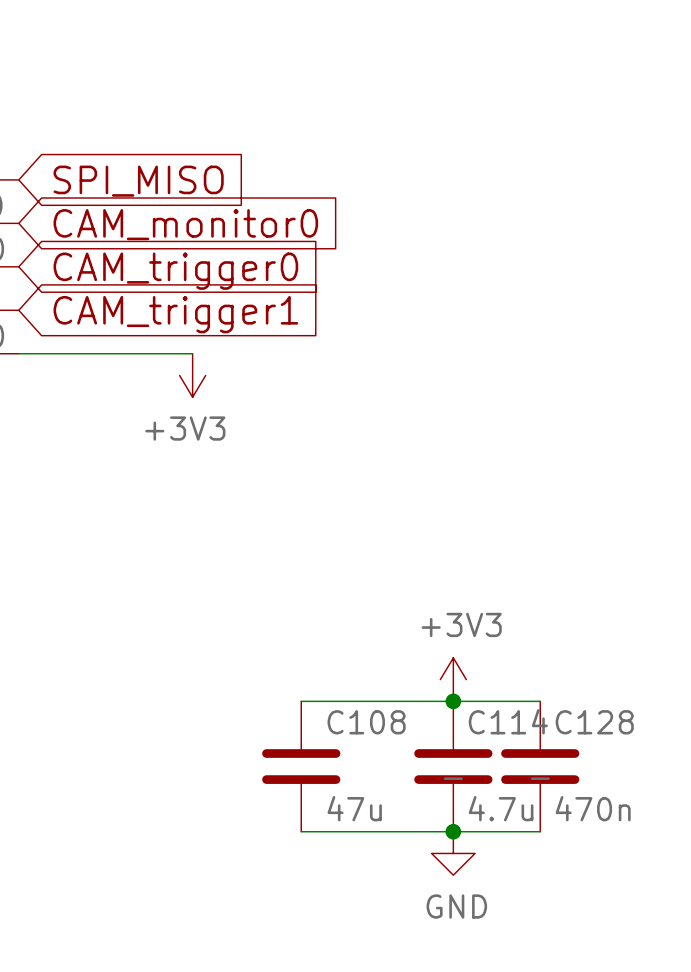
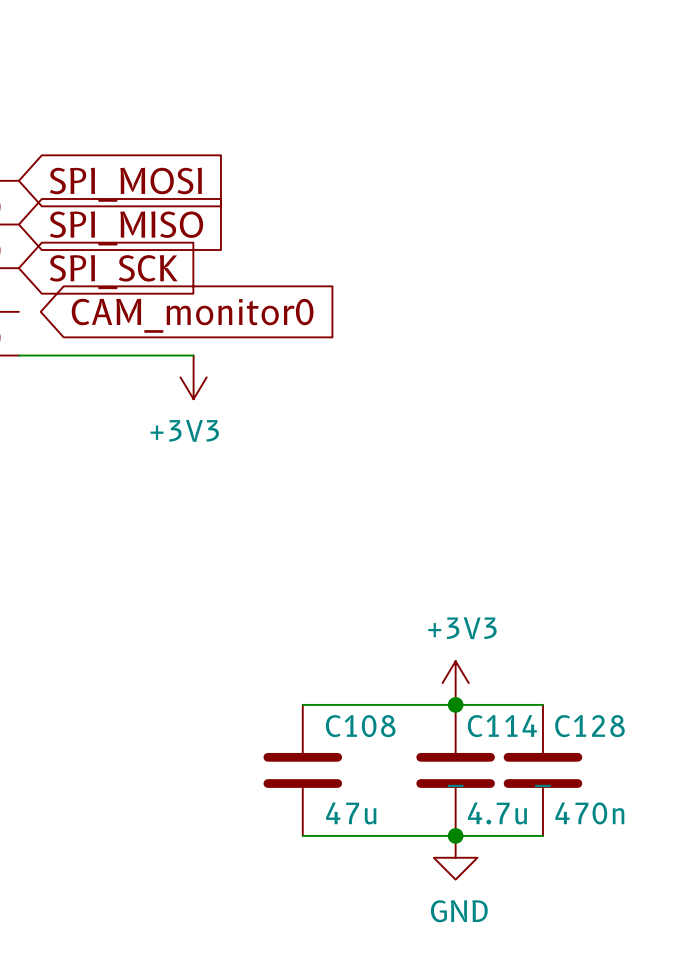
global label: SPI_MISO (138, 181) -> SPI_MOSI (125, 184)
global label: CAM_monitor0 (185, 224) -> SPI_MISO (126, 228)
global label: CAM_trigger0 (175, 271) -> SPI_SCK (113, 272)
global label: none -> CAM_monitor0 (192, 315)
global label: CAM_trigger1 (175, 314) -> none

